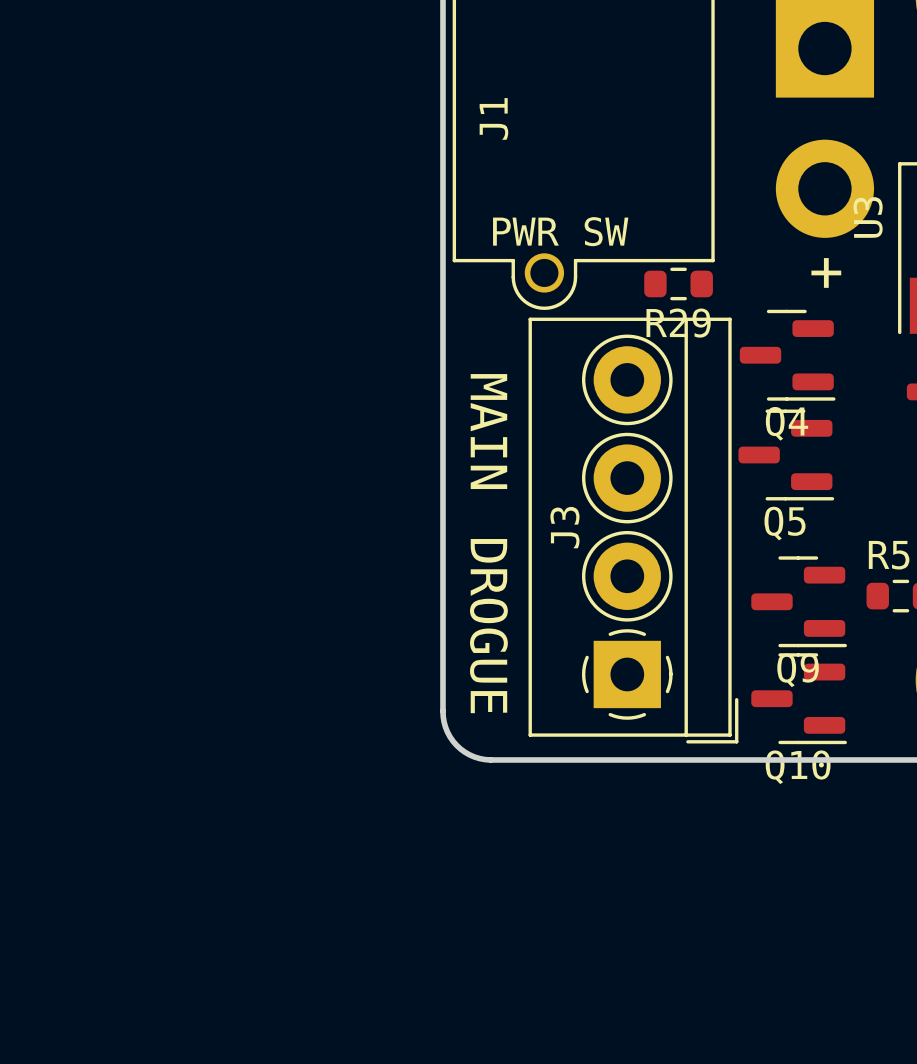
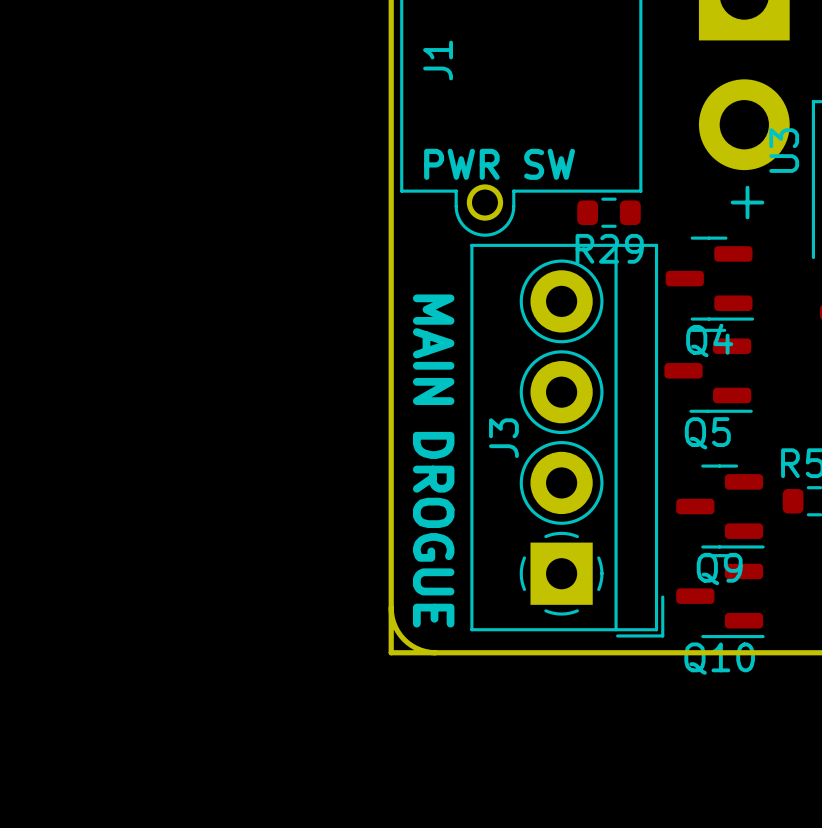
board edge: none -> (391, 607) (391, 652) (435, 652)

